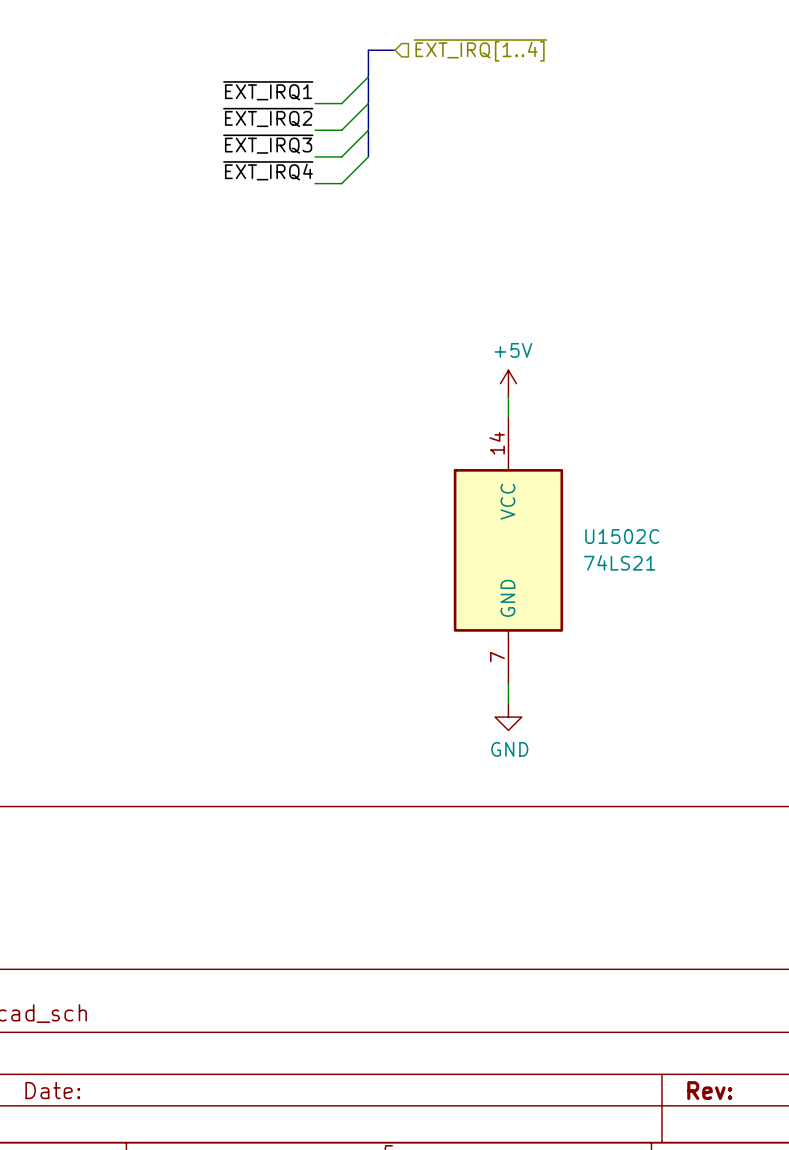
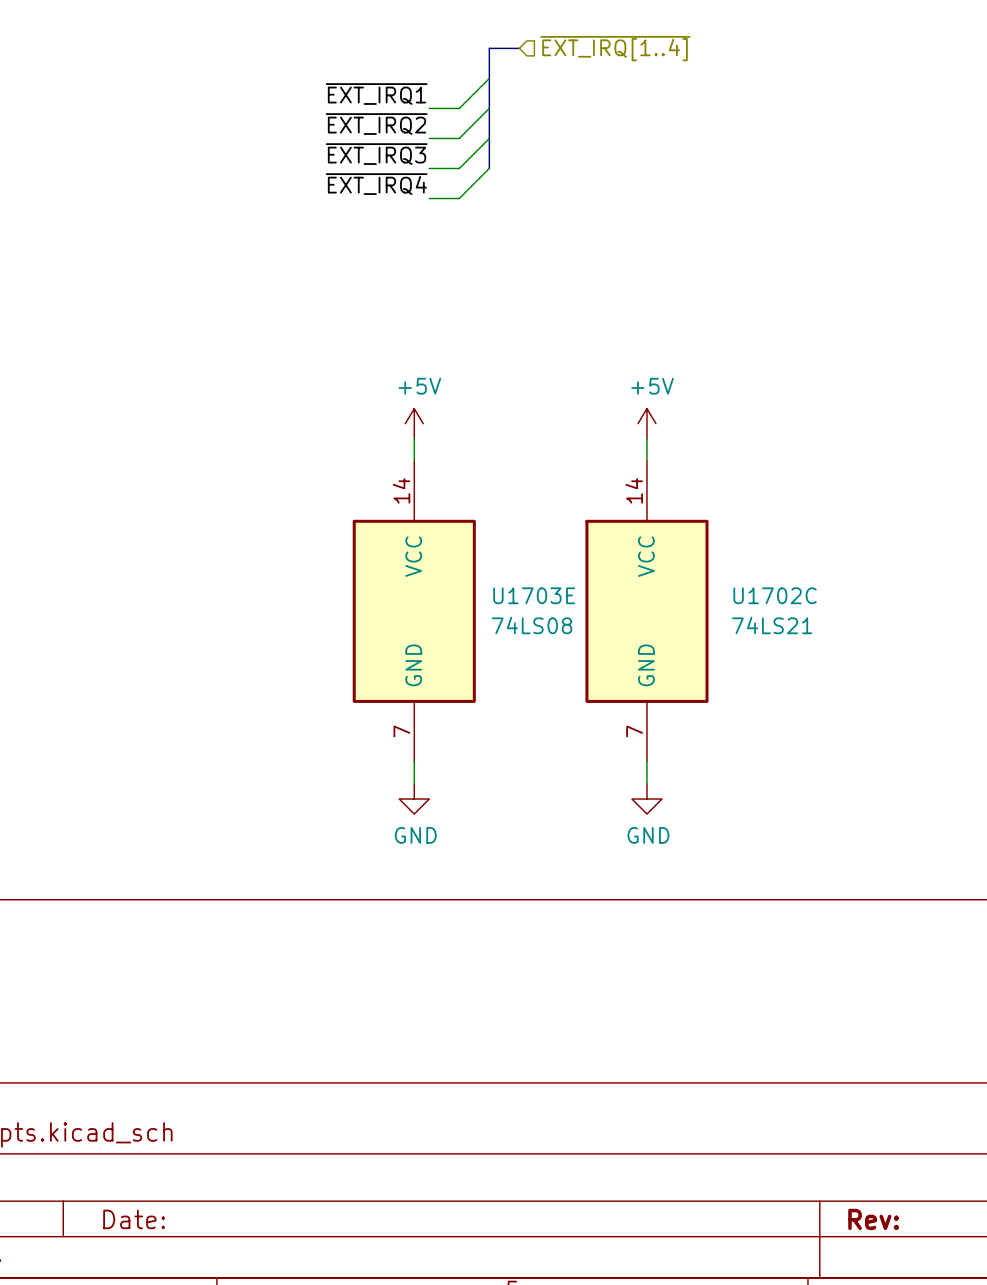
power symbol: none -> +5V (414, 423)
wire: none -> (414, 438) (414, 461)
U1502C name: U1502C (622, 536) -> U1702C (775, 595)
U1703E: none -> 74LS08 (414, 611)
wire: none -> (414, 761) (414, 784)
power symbol: none -> GND (414, 799)

